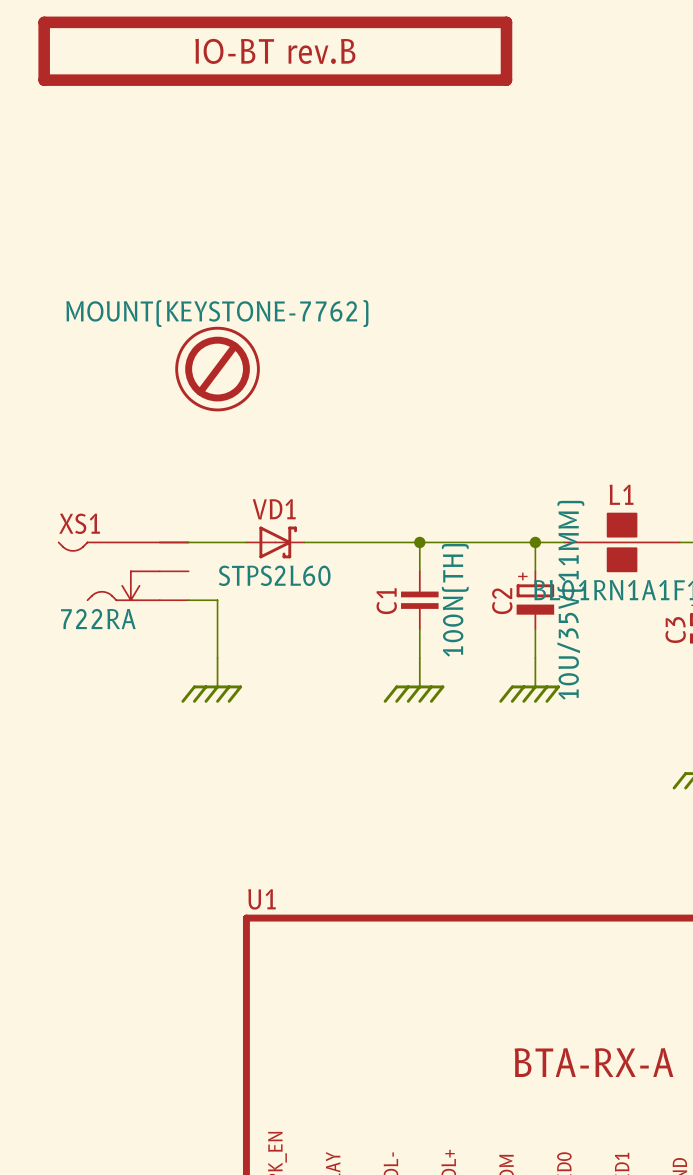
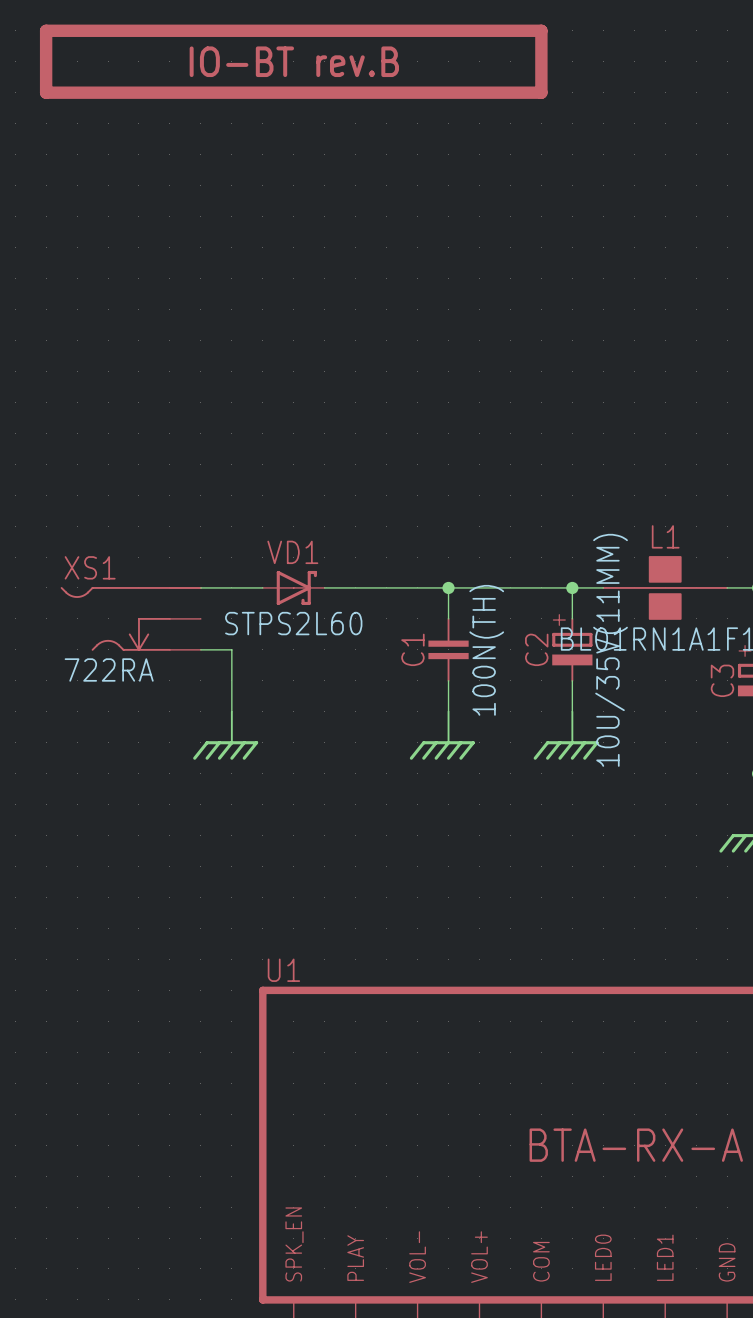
part: MOUNT(KEYSTONE-7762) (217, 369) -> none

